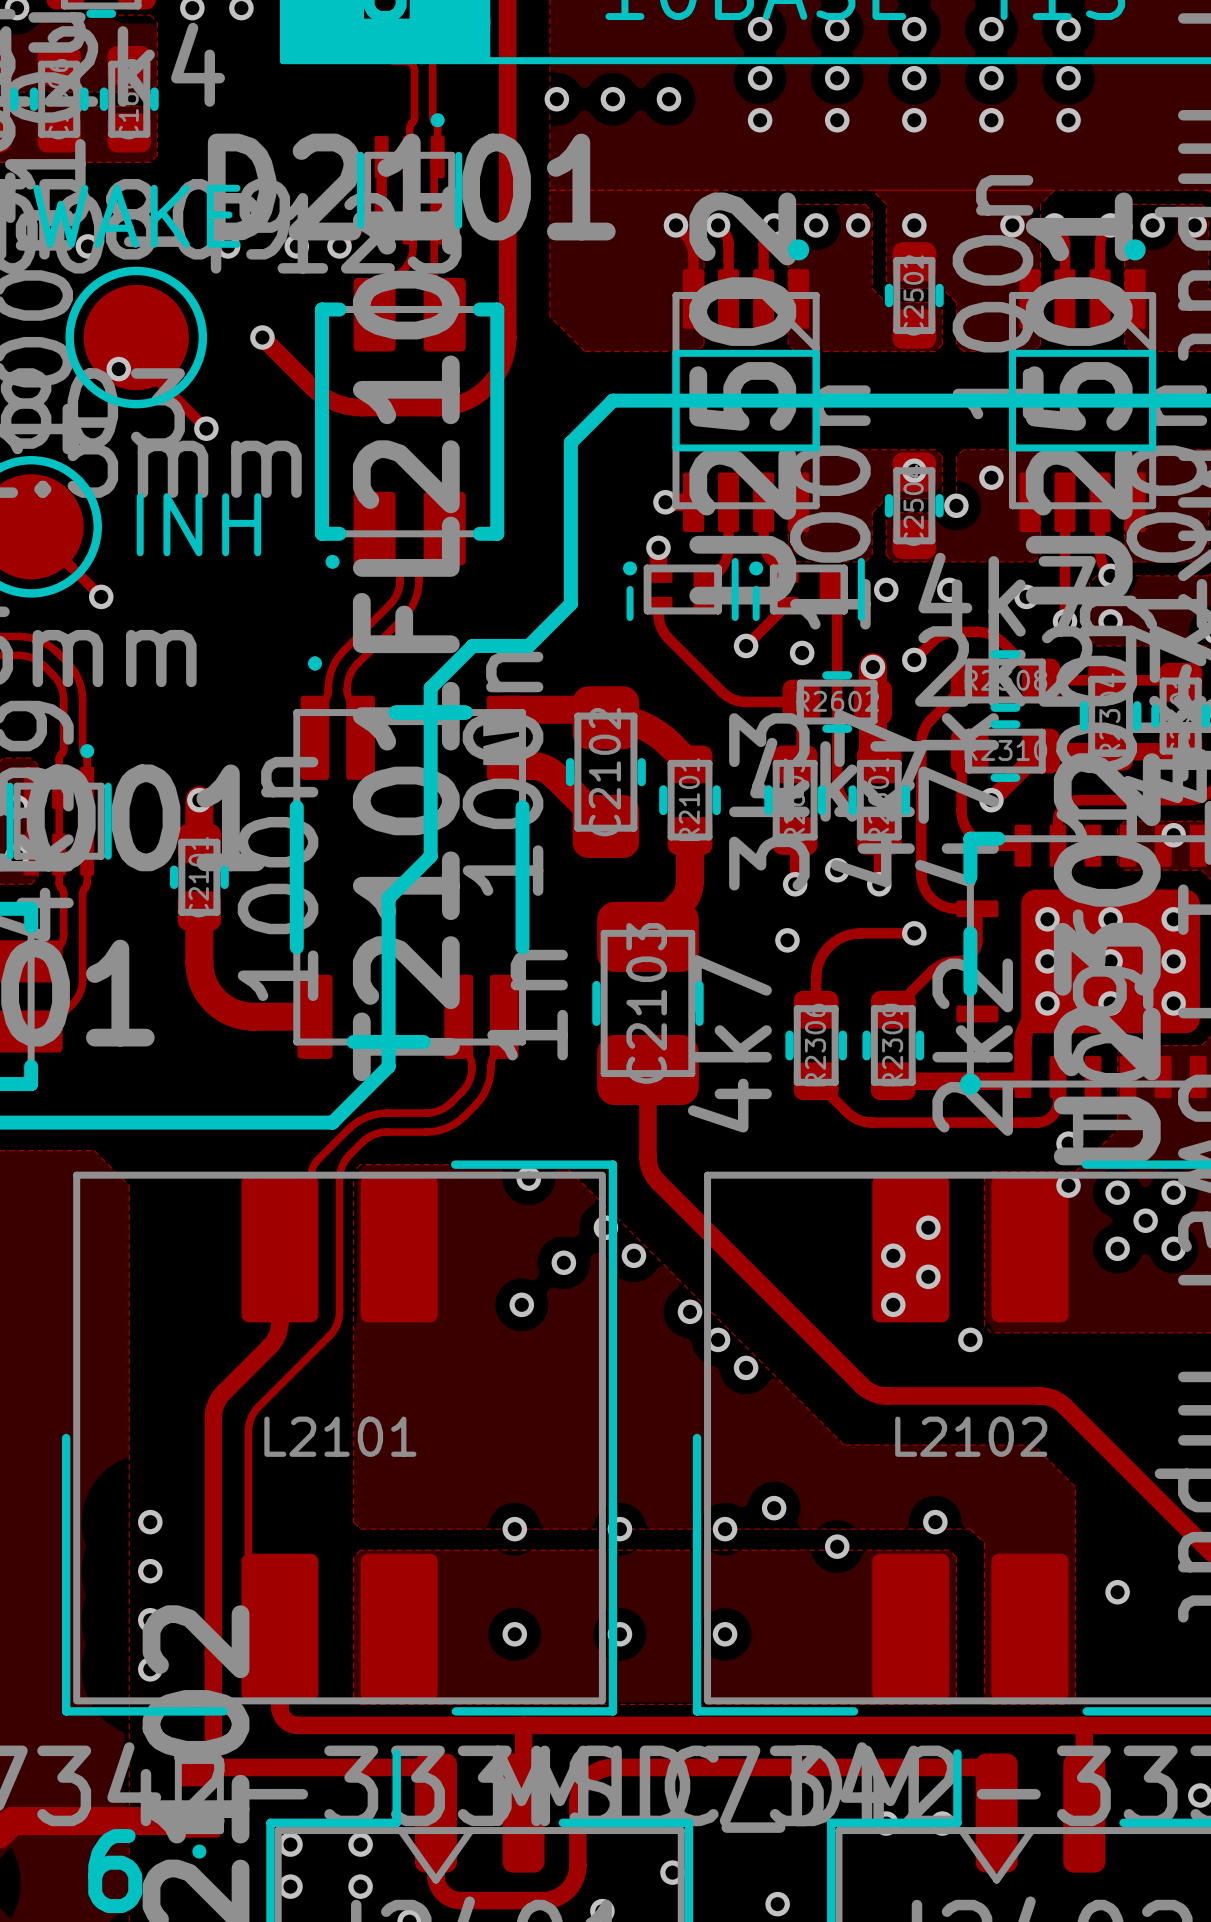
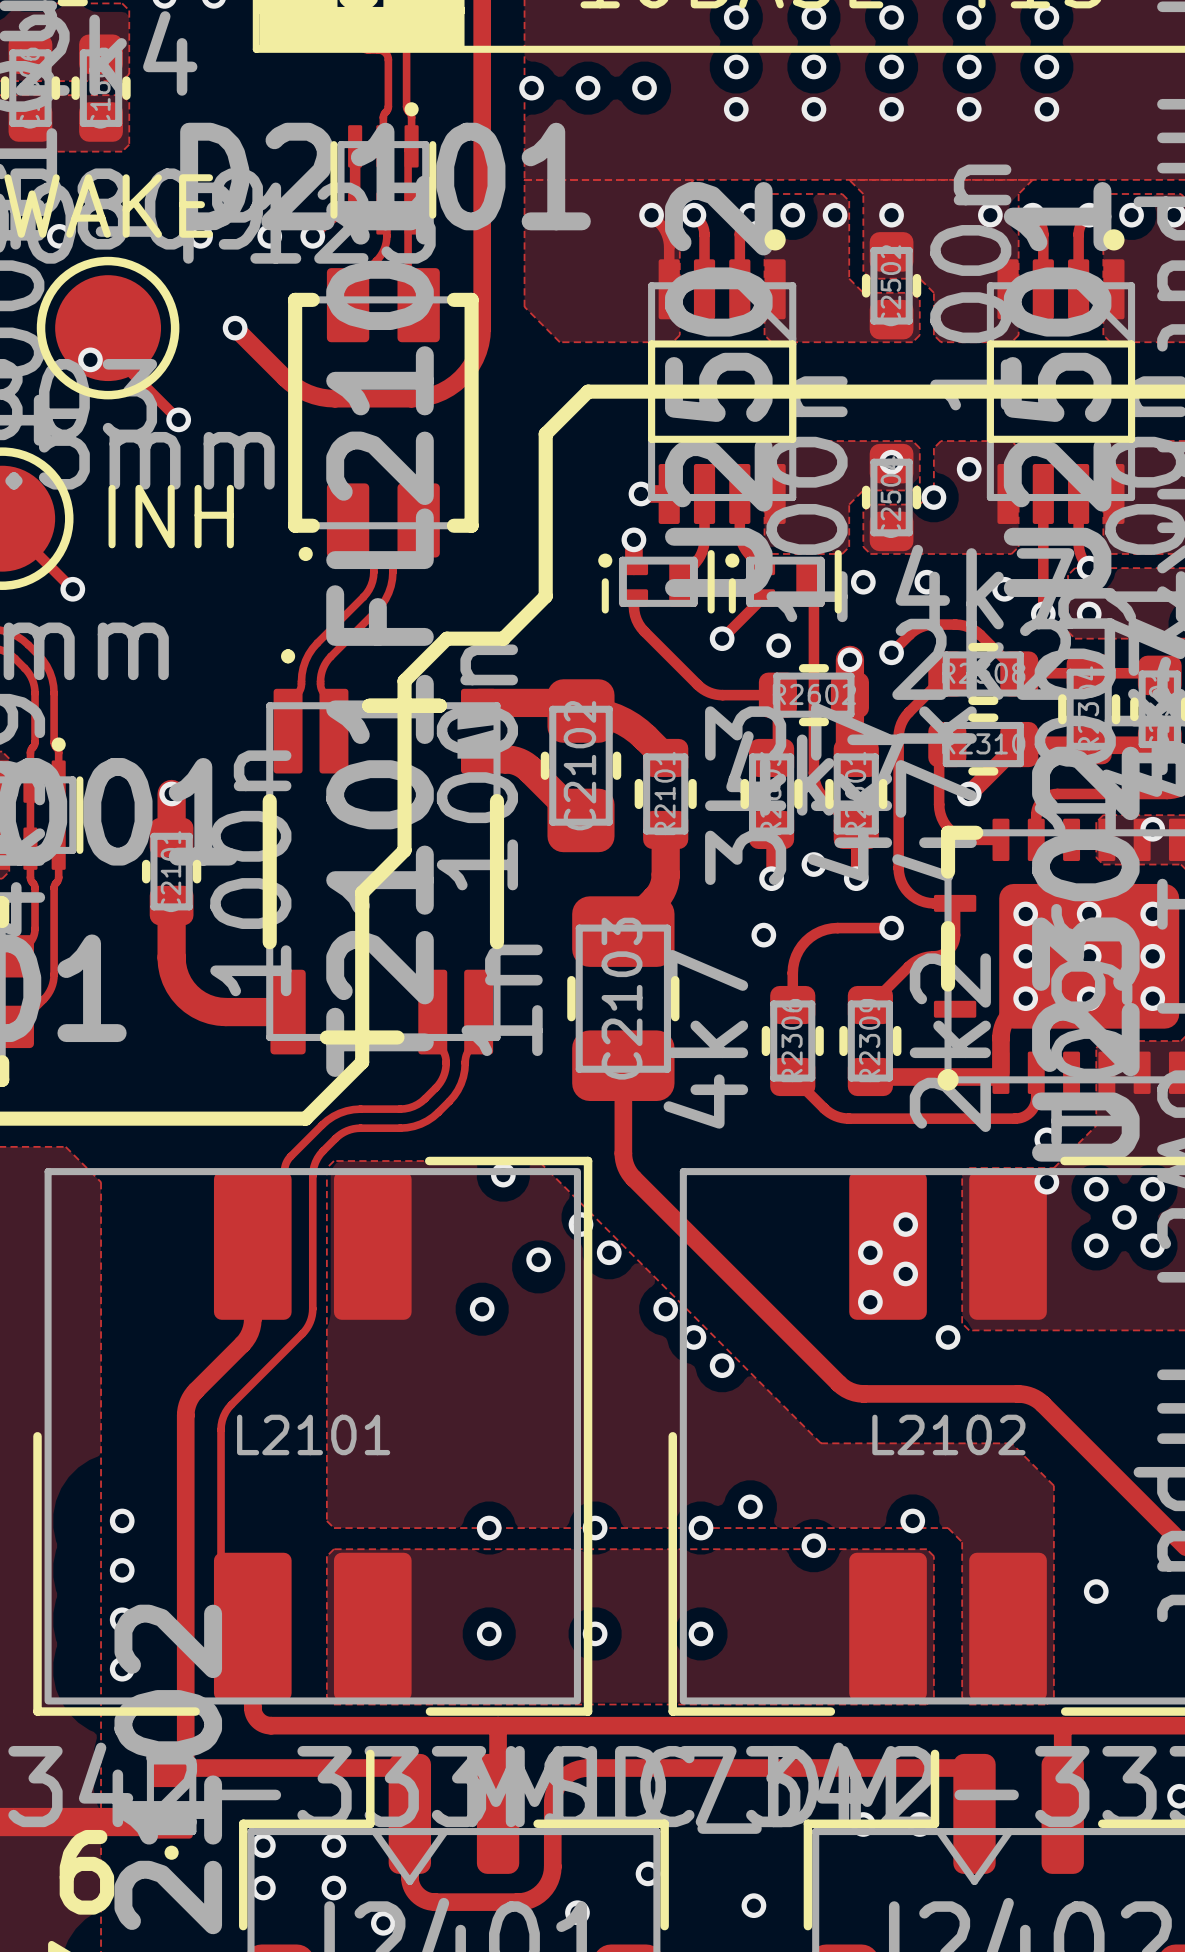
via position: (521, 1304) -> (482, 1309)

